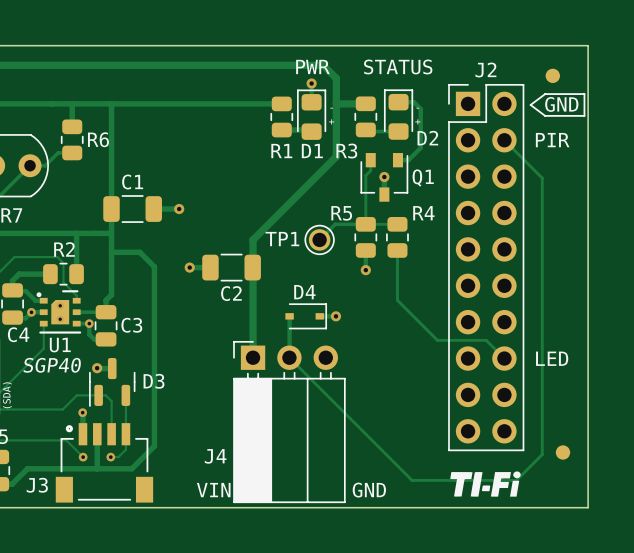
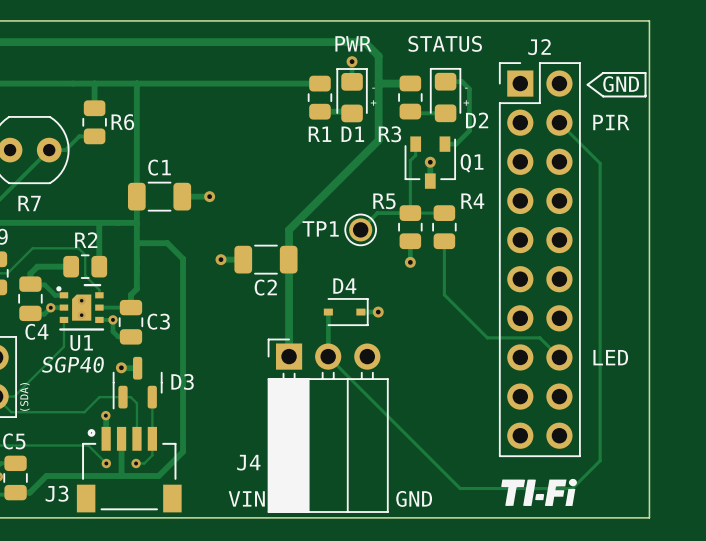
part: (552, 75) -> none
part: (563, 452) -> none

